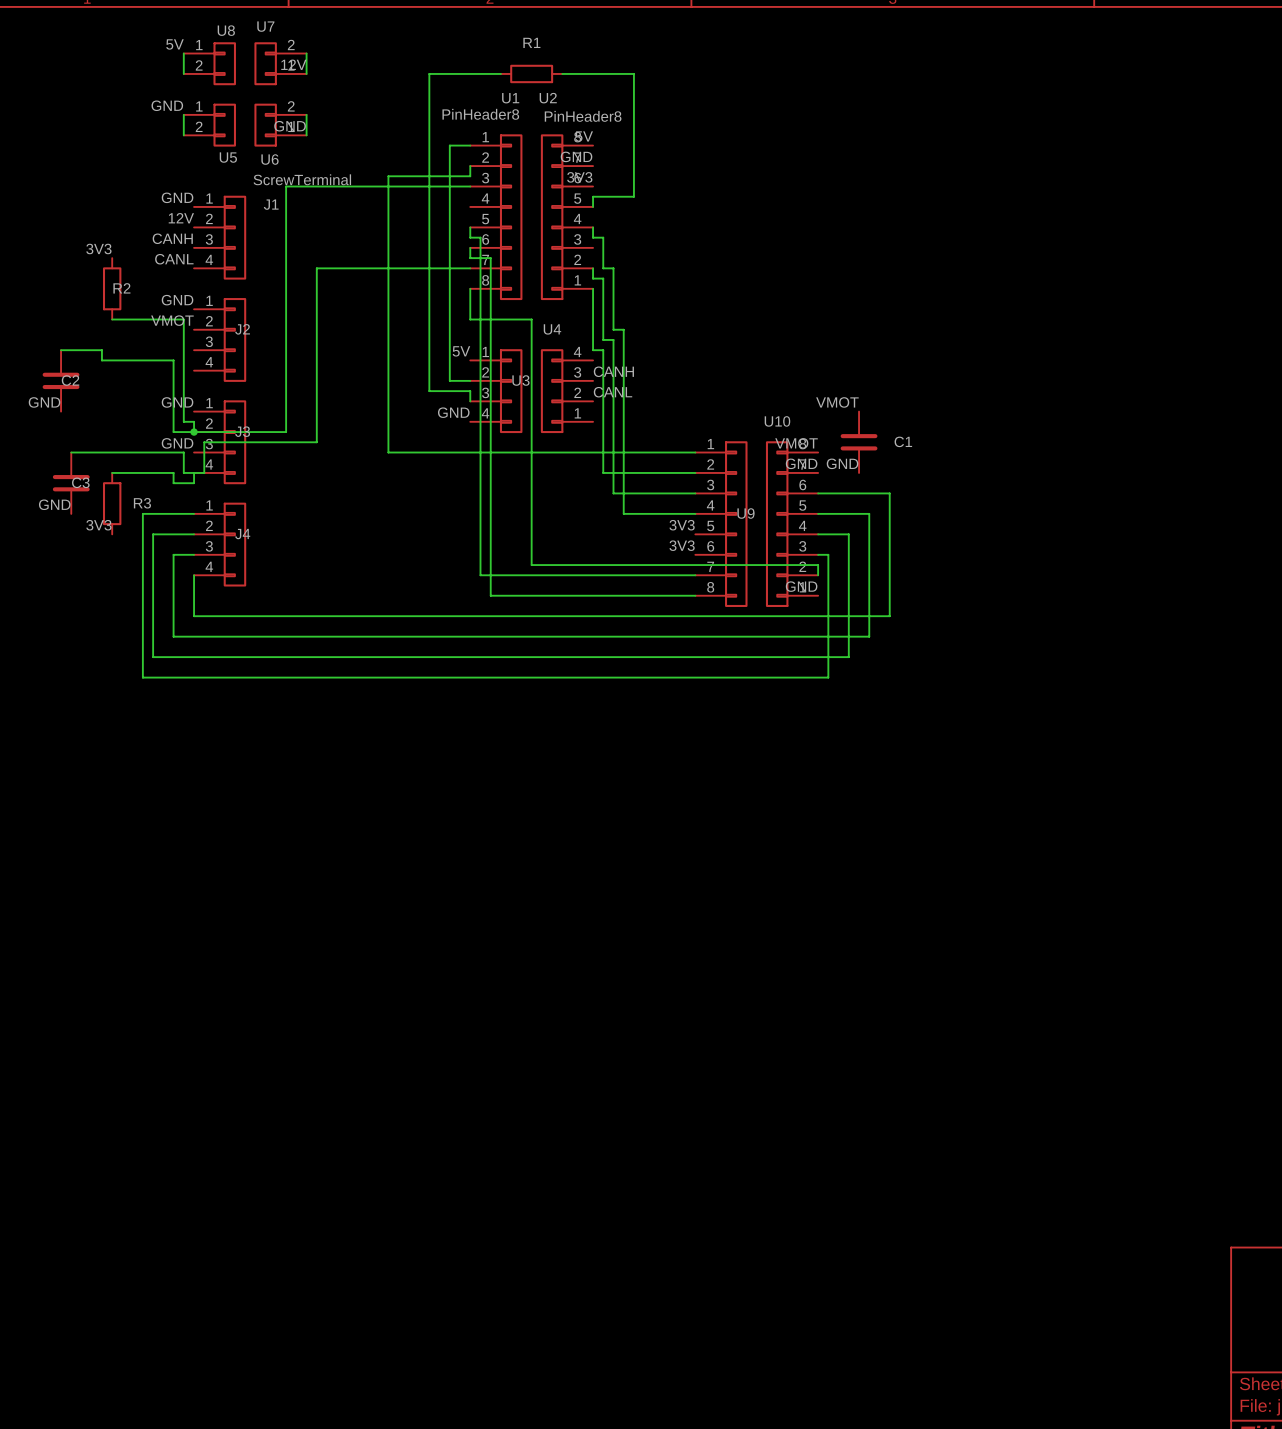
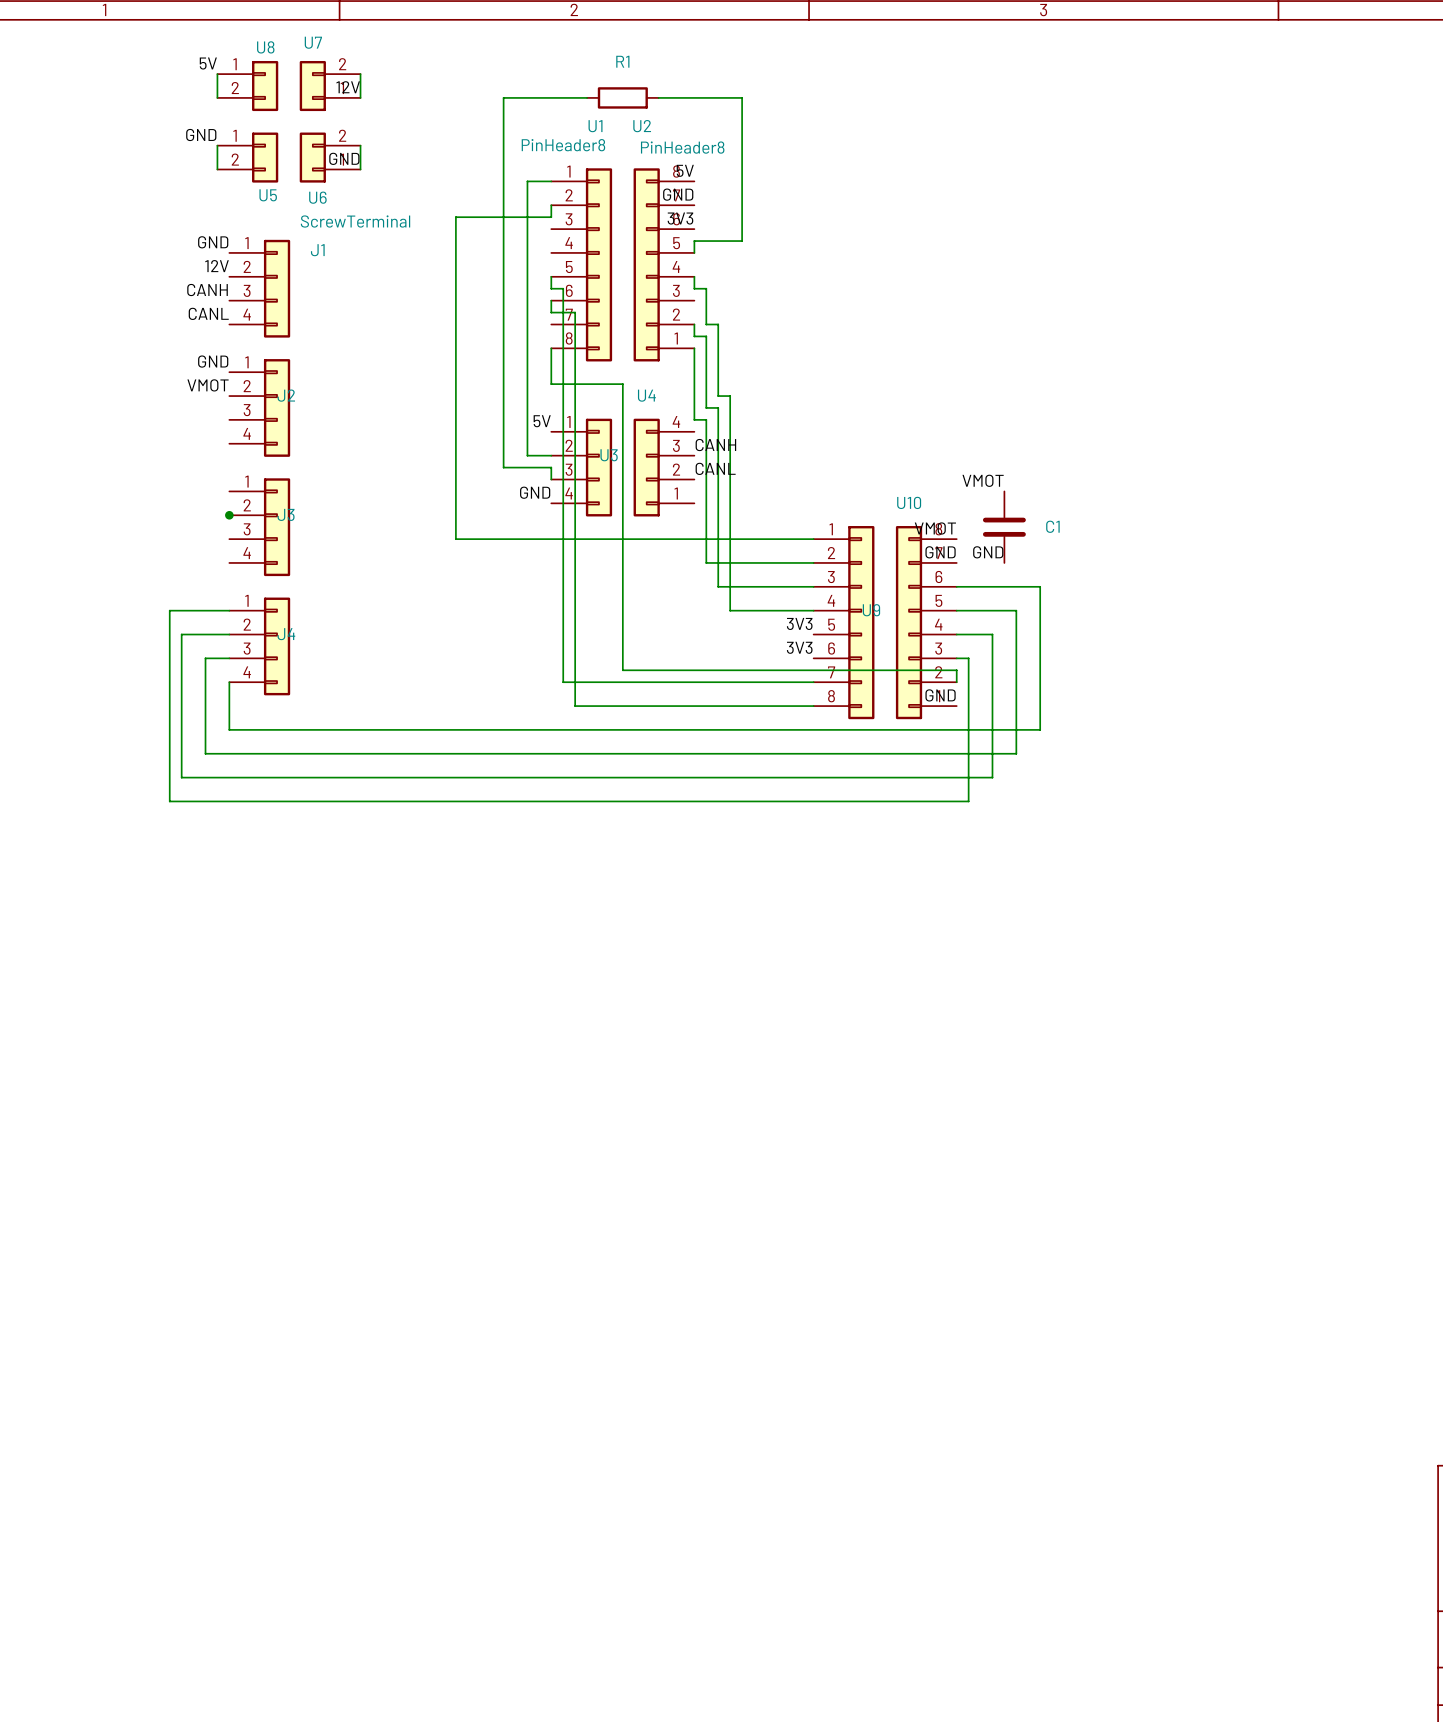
wire: (470, 186) (286, 186) (286, 432) (173, 432) (173, 360) (101, 360) (101, 350) (61, 350) -> none
label: 3V3 (98, 248) -> none
wire: (470, 268) (316, 268) (316, 442) (204, 442) (204, 472) (183, 472) (183, 452) (71, 452) -> none
R2: (112, 288) -> none
wire: (112, 319) (183, 319) (183, 421) (194, 421) (194, 432) -> none
C2: (61, 380) -> none
label: GND (44, 402) -> none
label: GND (177, 402) -> none
label: GND (177, 443) -> none
wire: (112, 472) (173, 472) (173, 483) (194, 483) (194, 472) -> none
C3: (71, 483) -> none
R3: (112, 503) -> none
label: GND (54, 504) -> none
label: 3V3 (98, 525) -> none

